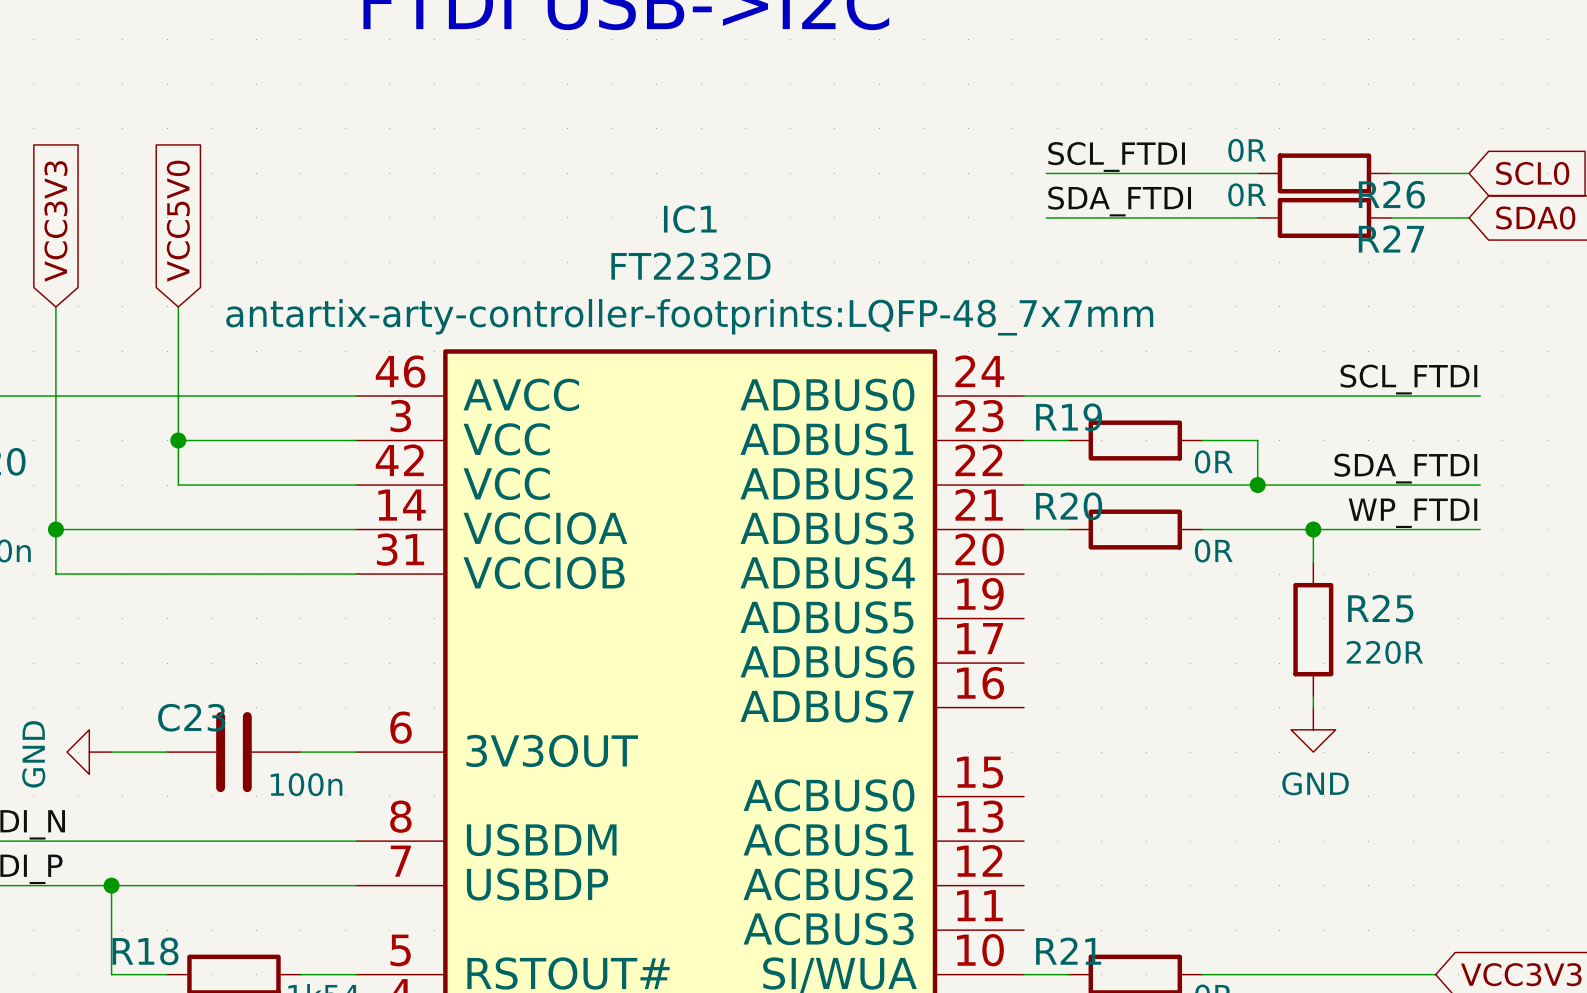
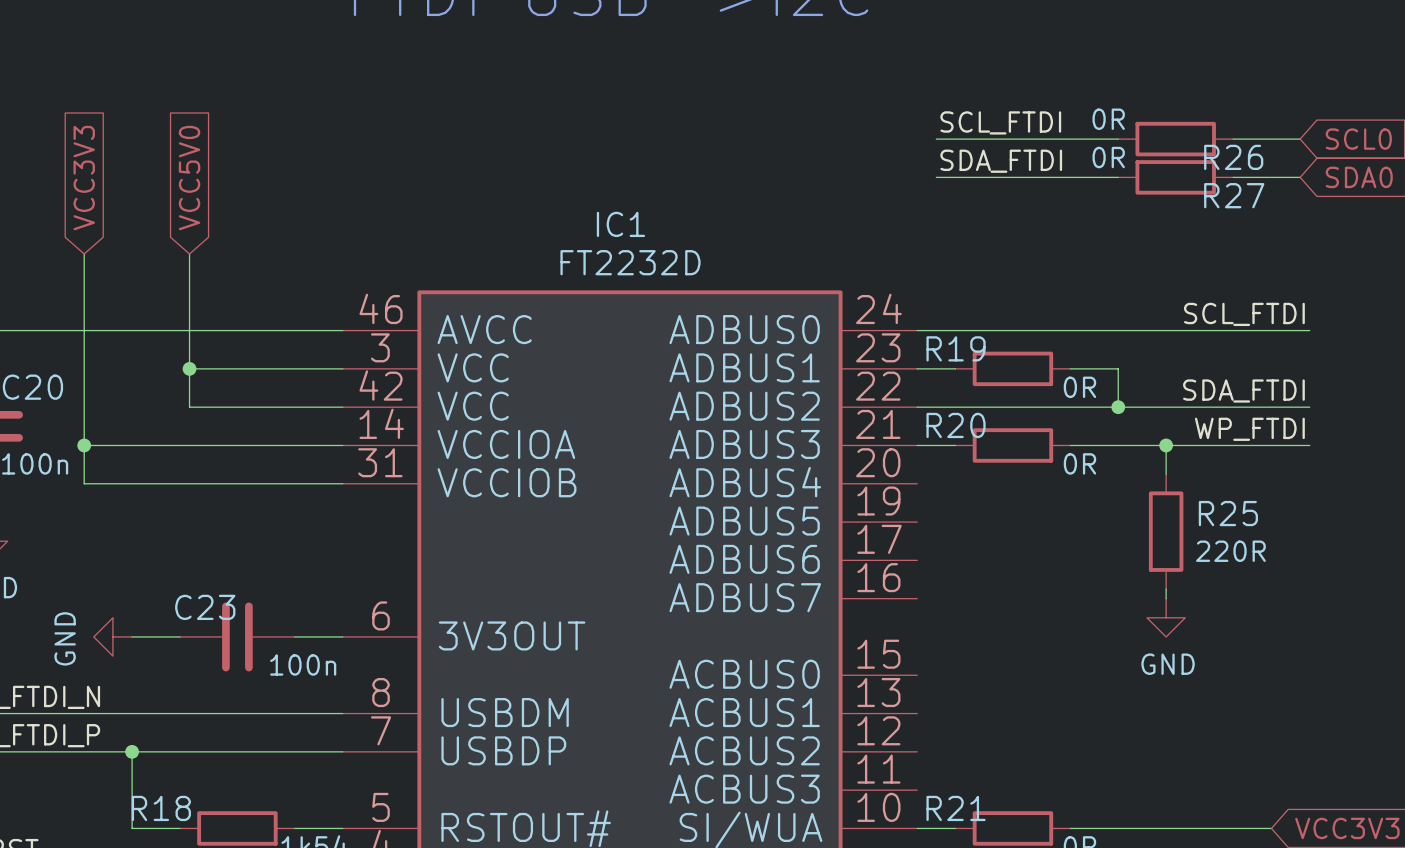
IC1 name position: IC1 (690, 219) -> IC1 (620, 224)
IC1 value position: FT2232D (690, 266) -> FT2232D (630, 262)
IC1 text: antartix-arty-controller-footprints:LQFP-48_7x7mm (689, 317) -> none

